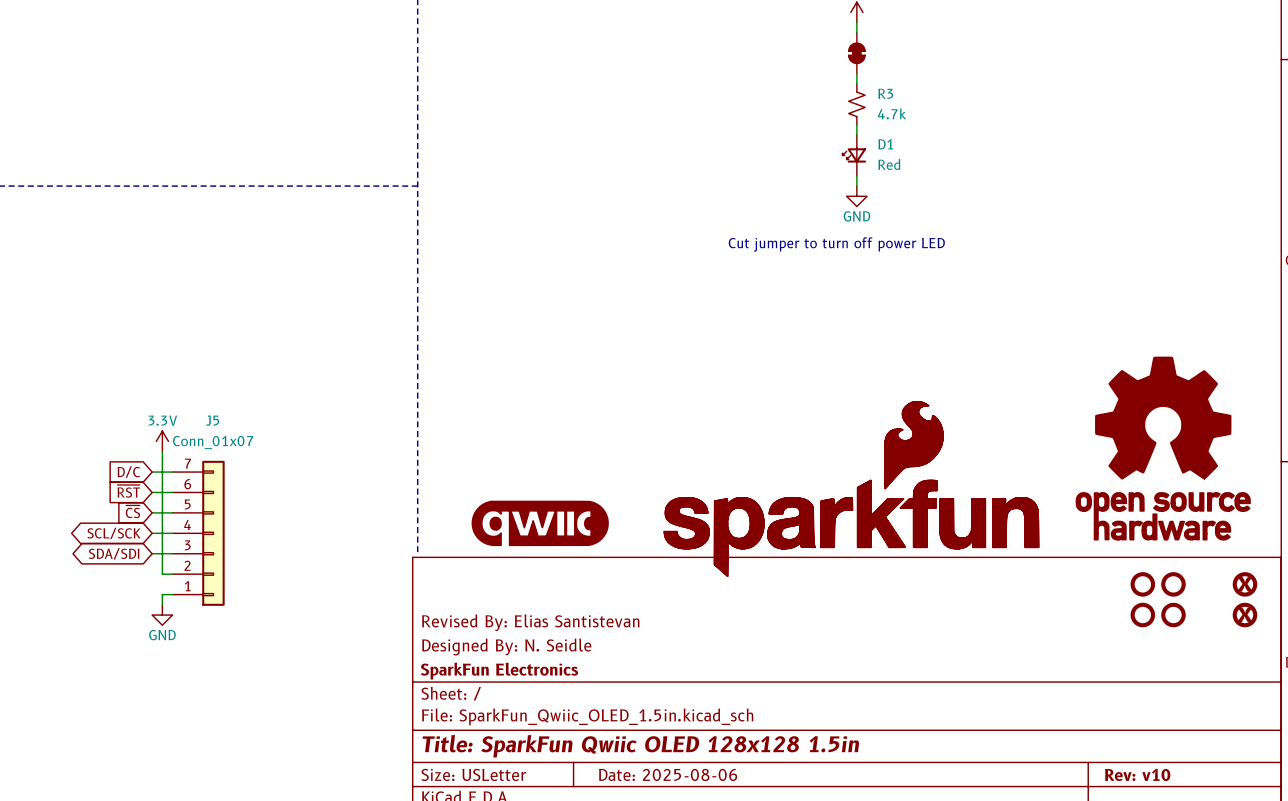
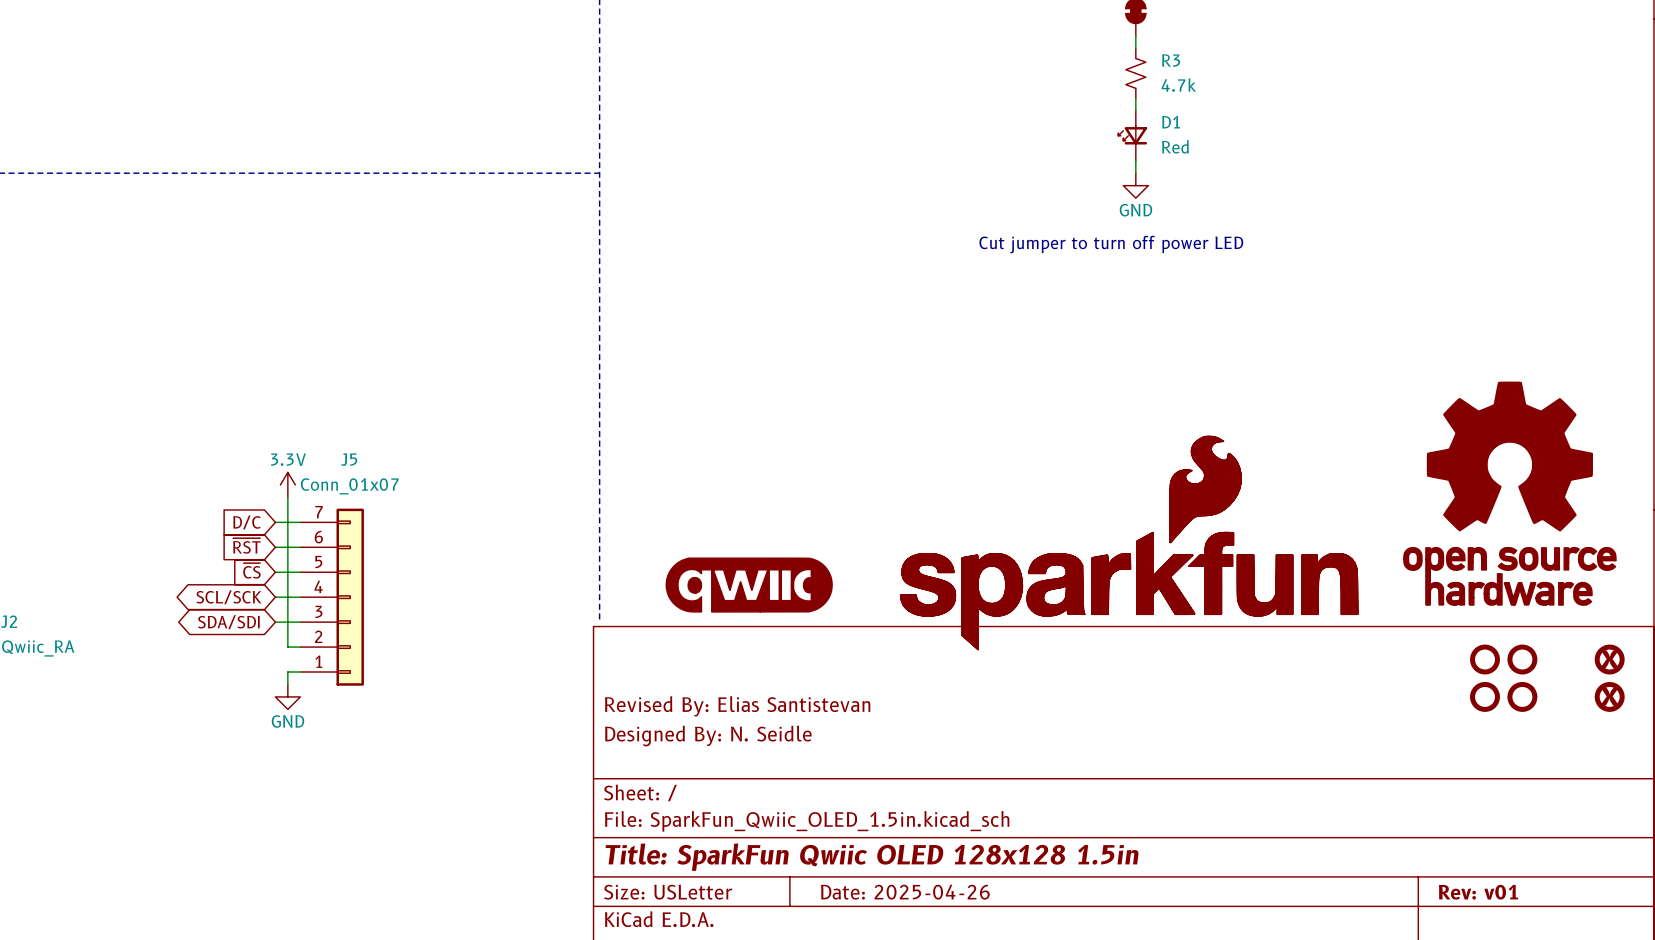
title block: SparkFun Electronics (499, 671) -> none
title block: Date: 2025-08-06 (668, 774) -> Date: 2025-04-26 (905, 892)
title block: Rev: v10 (1137, 774) -> Rev: v01 (1478, 892)

